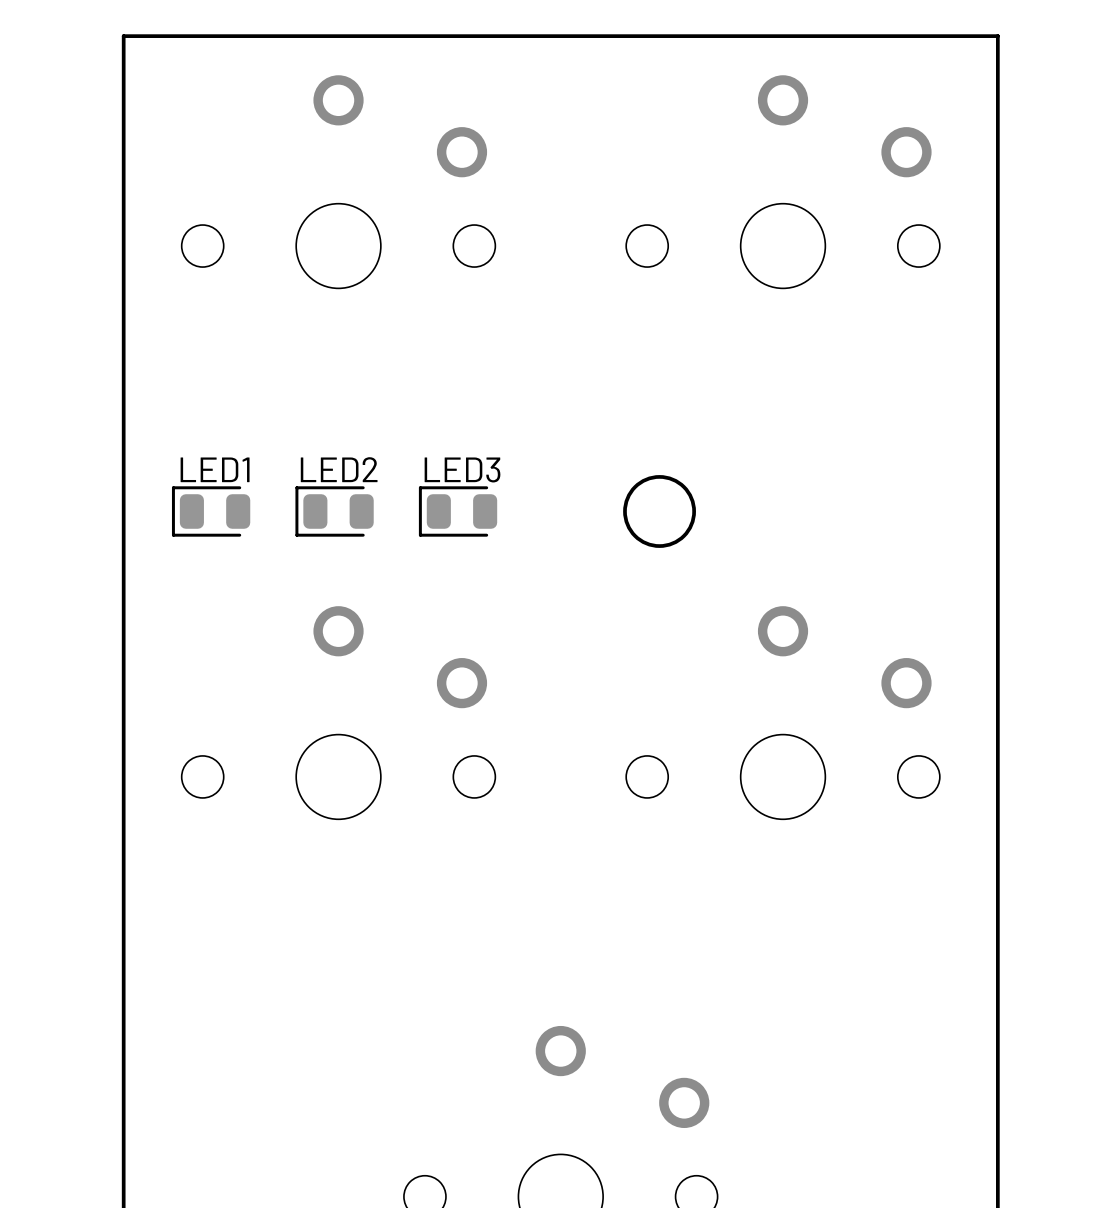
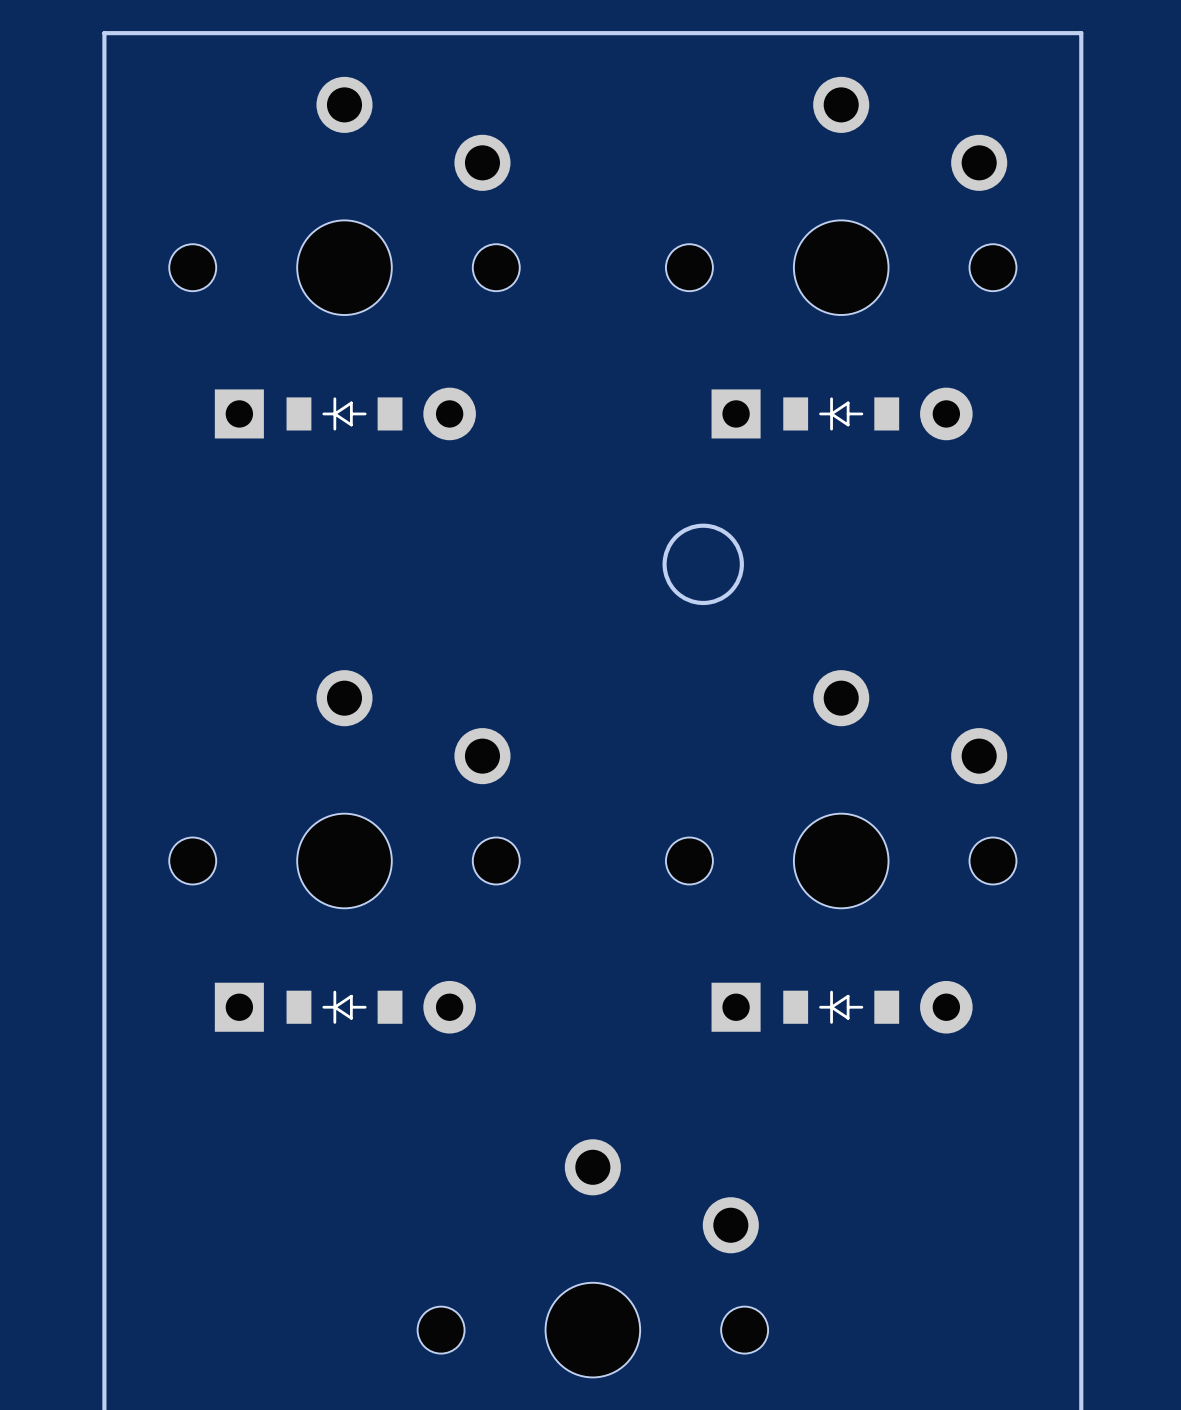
part: none -> (345, 413)
part: none -> (842, 413)
LED1: (211, 511) -> none
LED2: (334, 511) -> none
LED3: (458, 511) -> none
part: none -> (345, 1007)
part: none -> (842, 1007)

